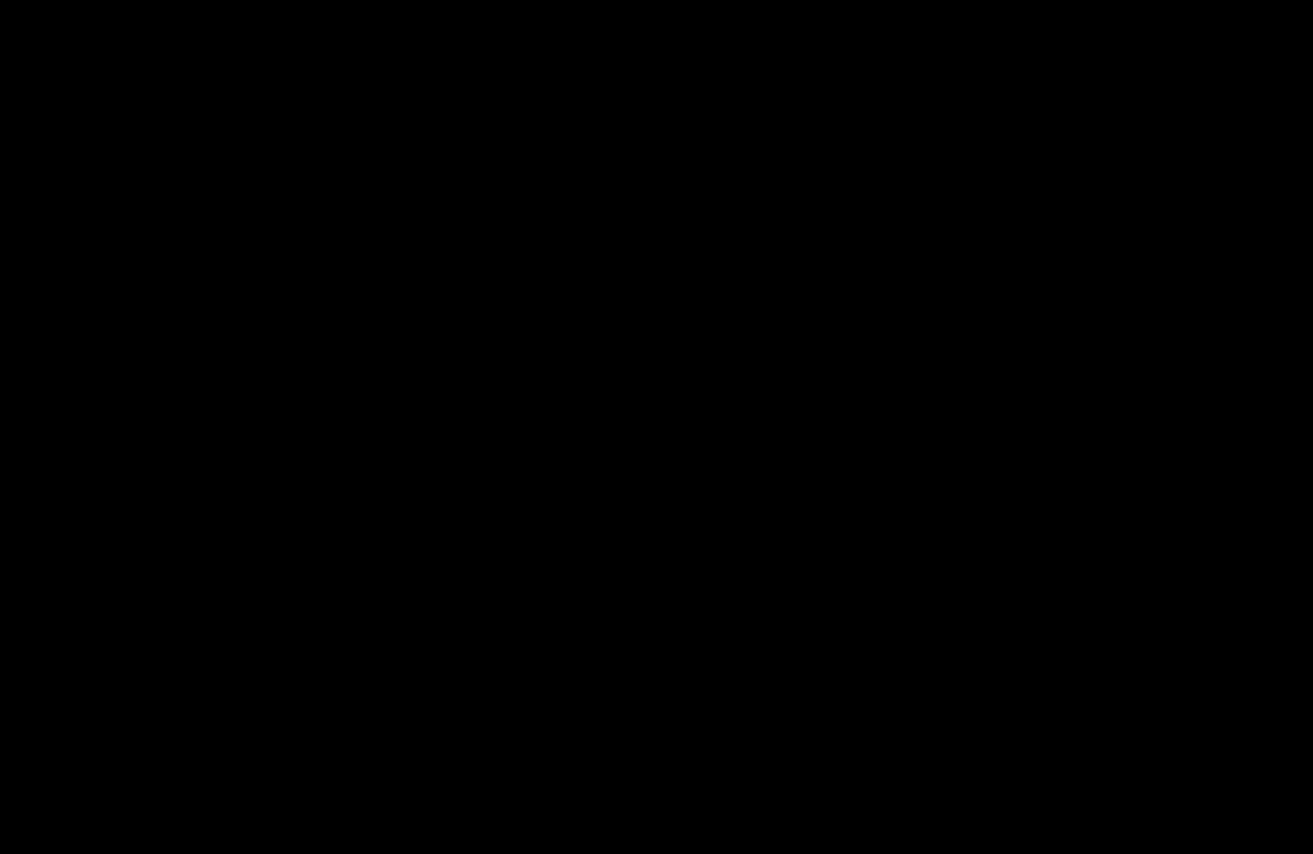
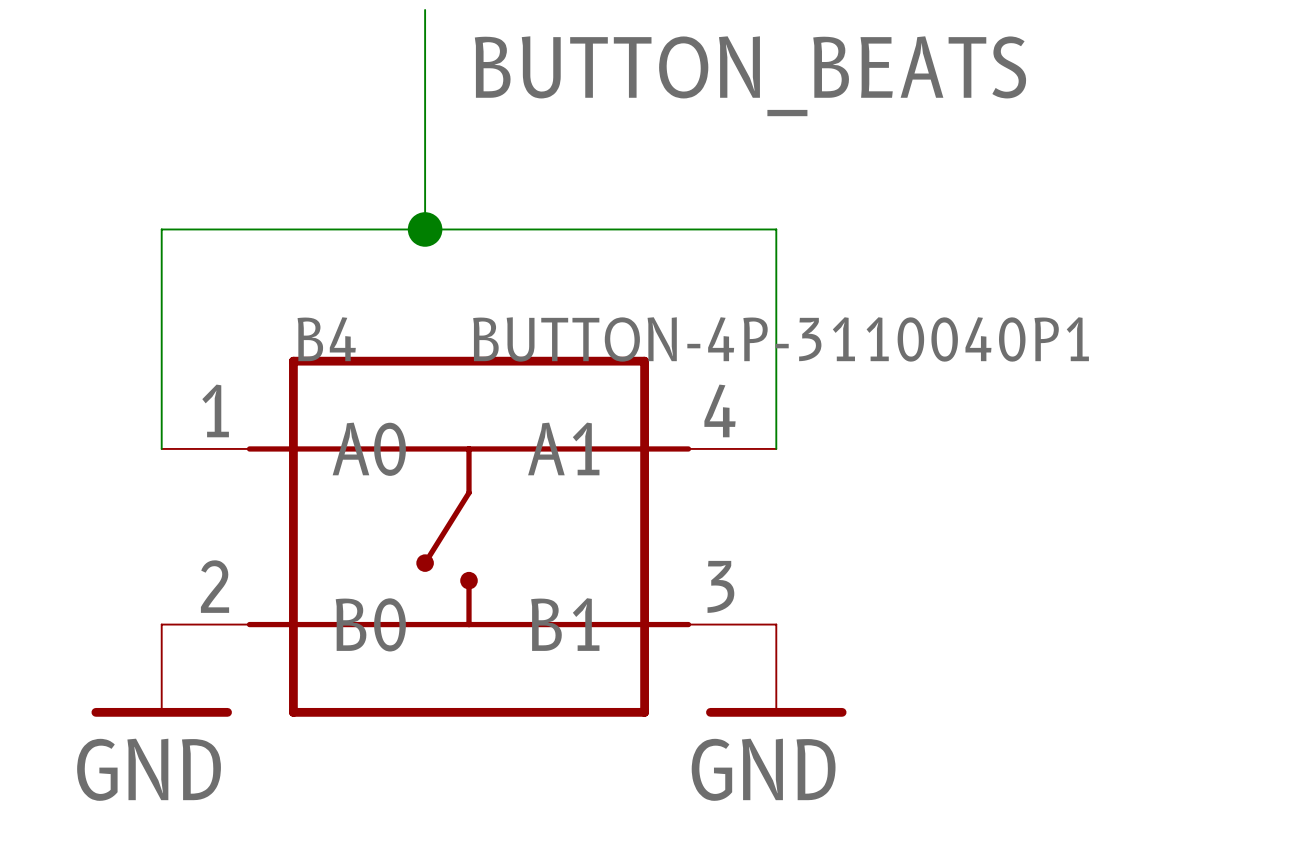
wire: none -> (425, 9) (425, 229)
label: none -> BUTTON_BEATS (750, 76)
junction: none -> (425, 229)
wire: none -> (161, 448) (161, 229) (776, 229) (776, 448)
B4: none -> BUTTON-4P-3110040P1 (469, 536)
power symbol: none -> GND (161, 670)
power symbol: none -> GND (776, 670)

